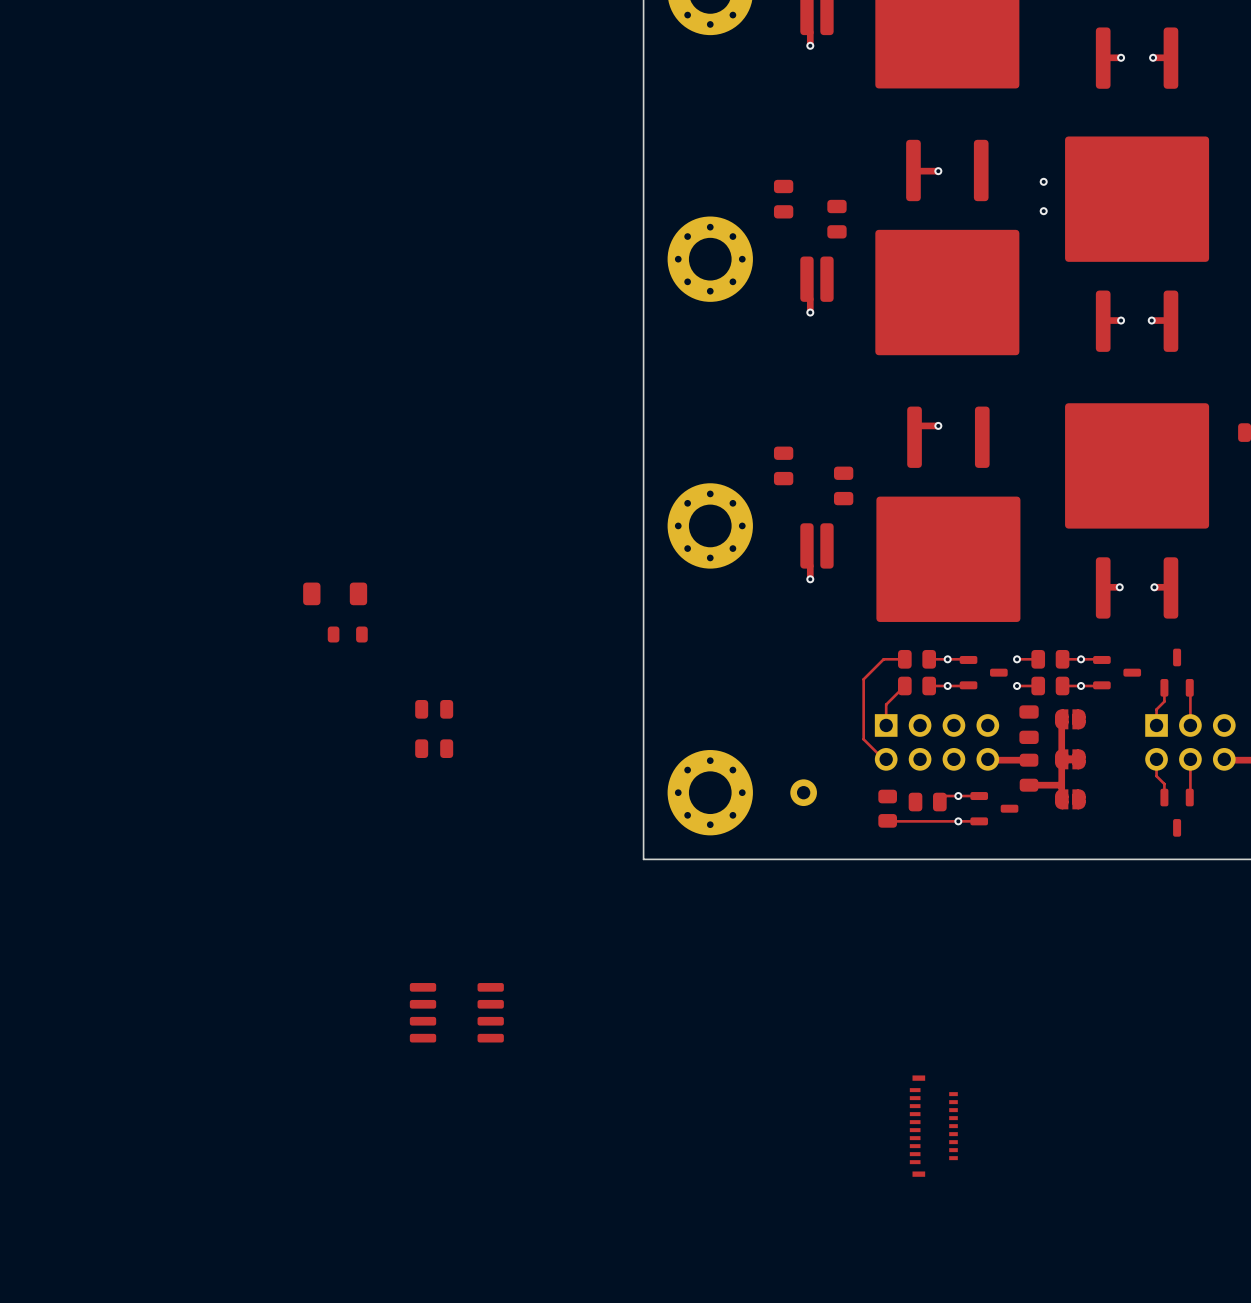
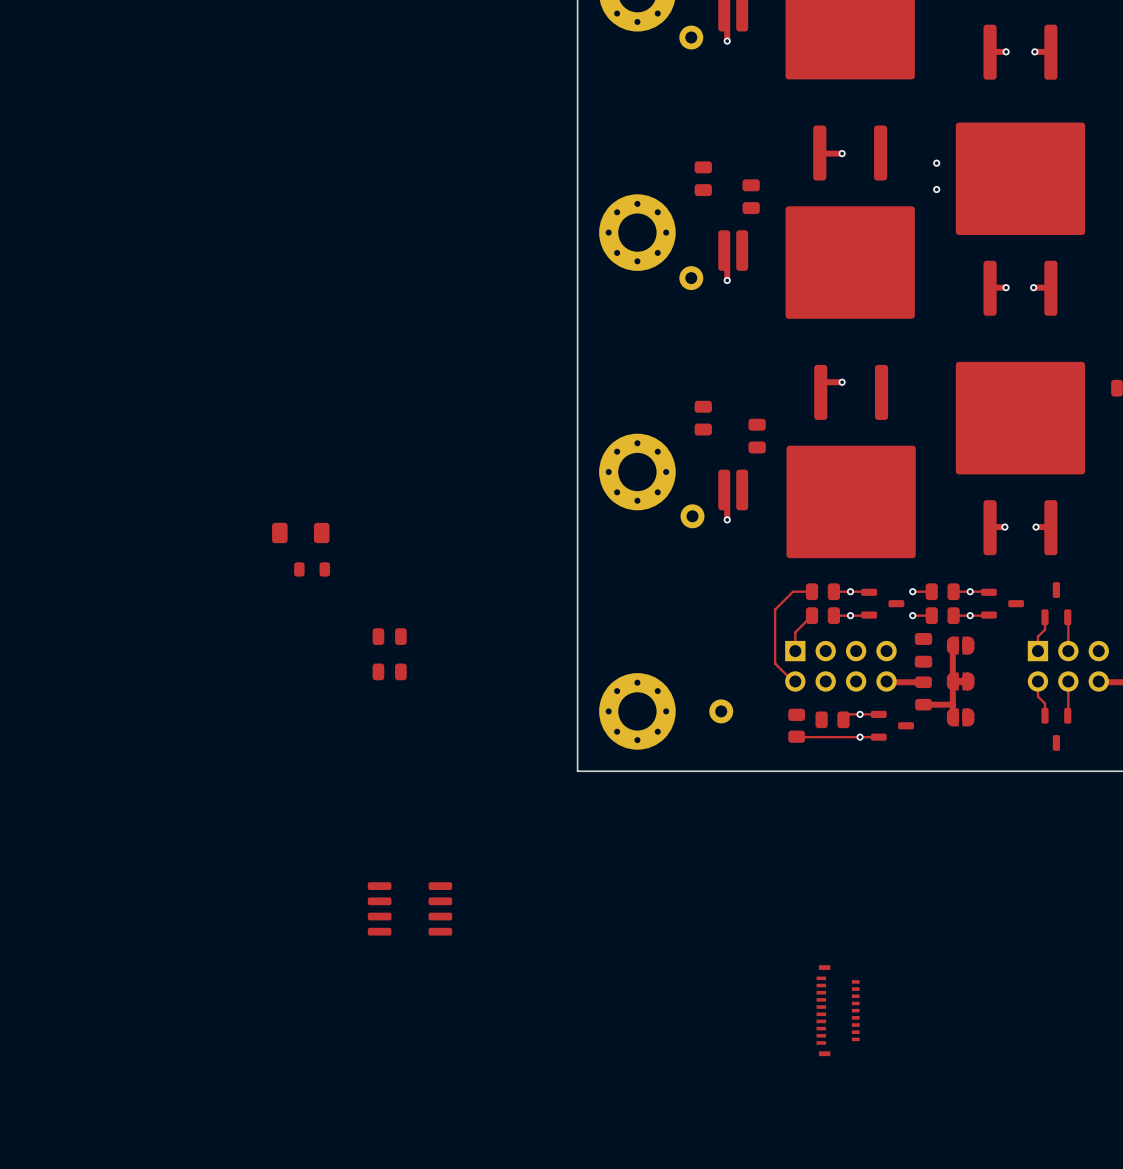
part: none -> (691, 37)
part: none -> (691, 278)
part: none -> (692, 516)

